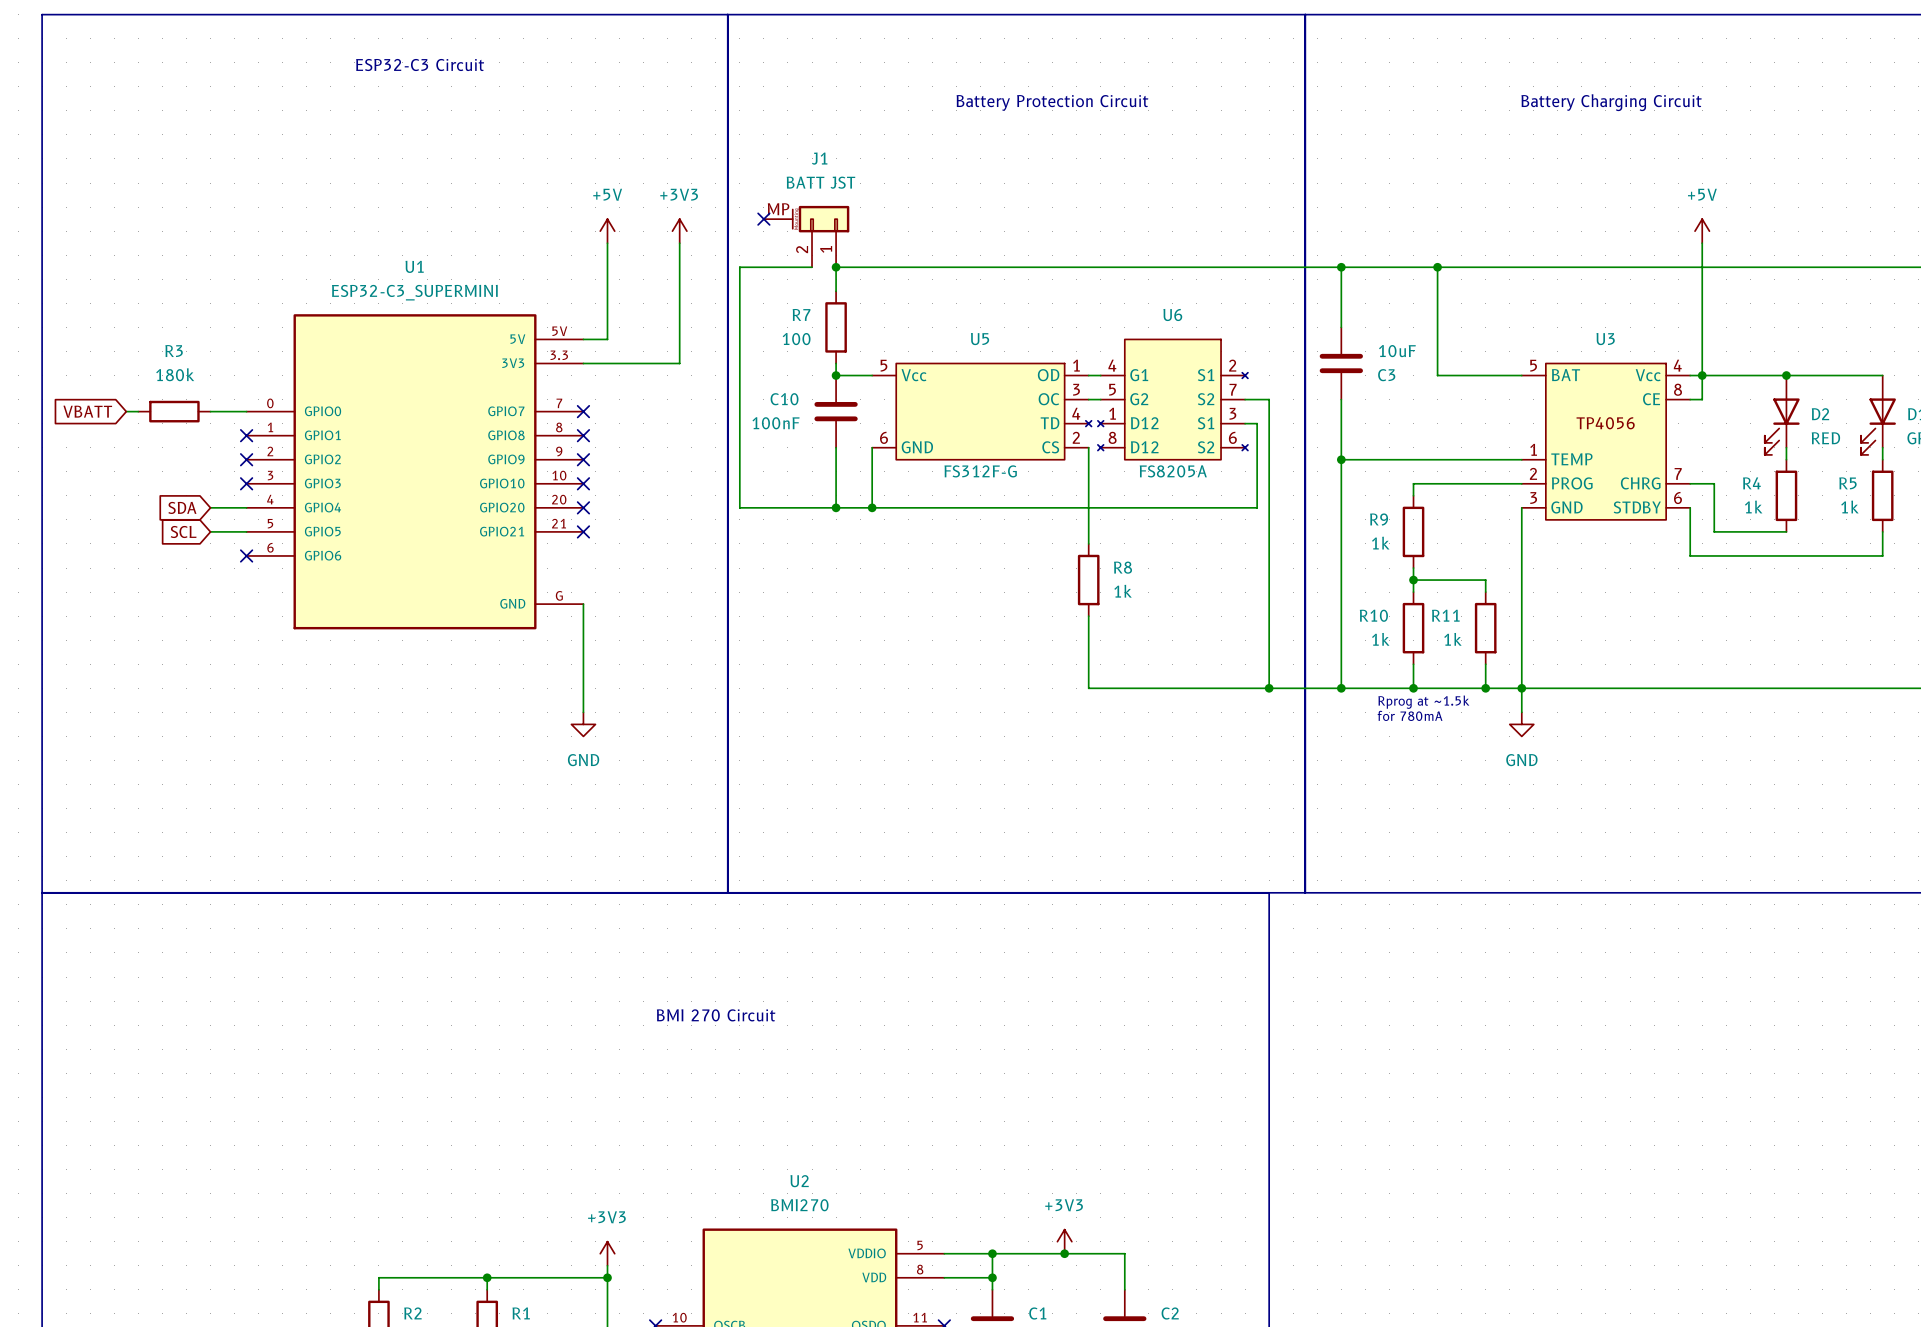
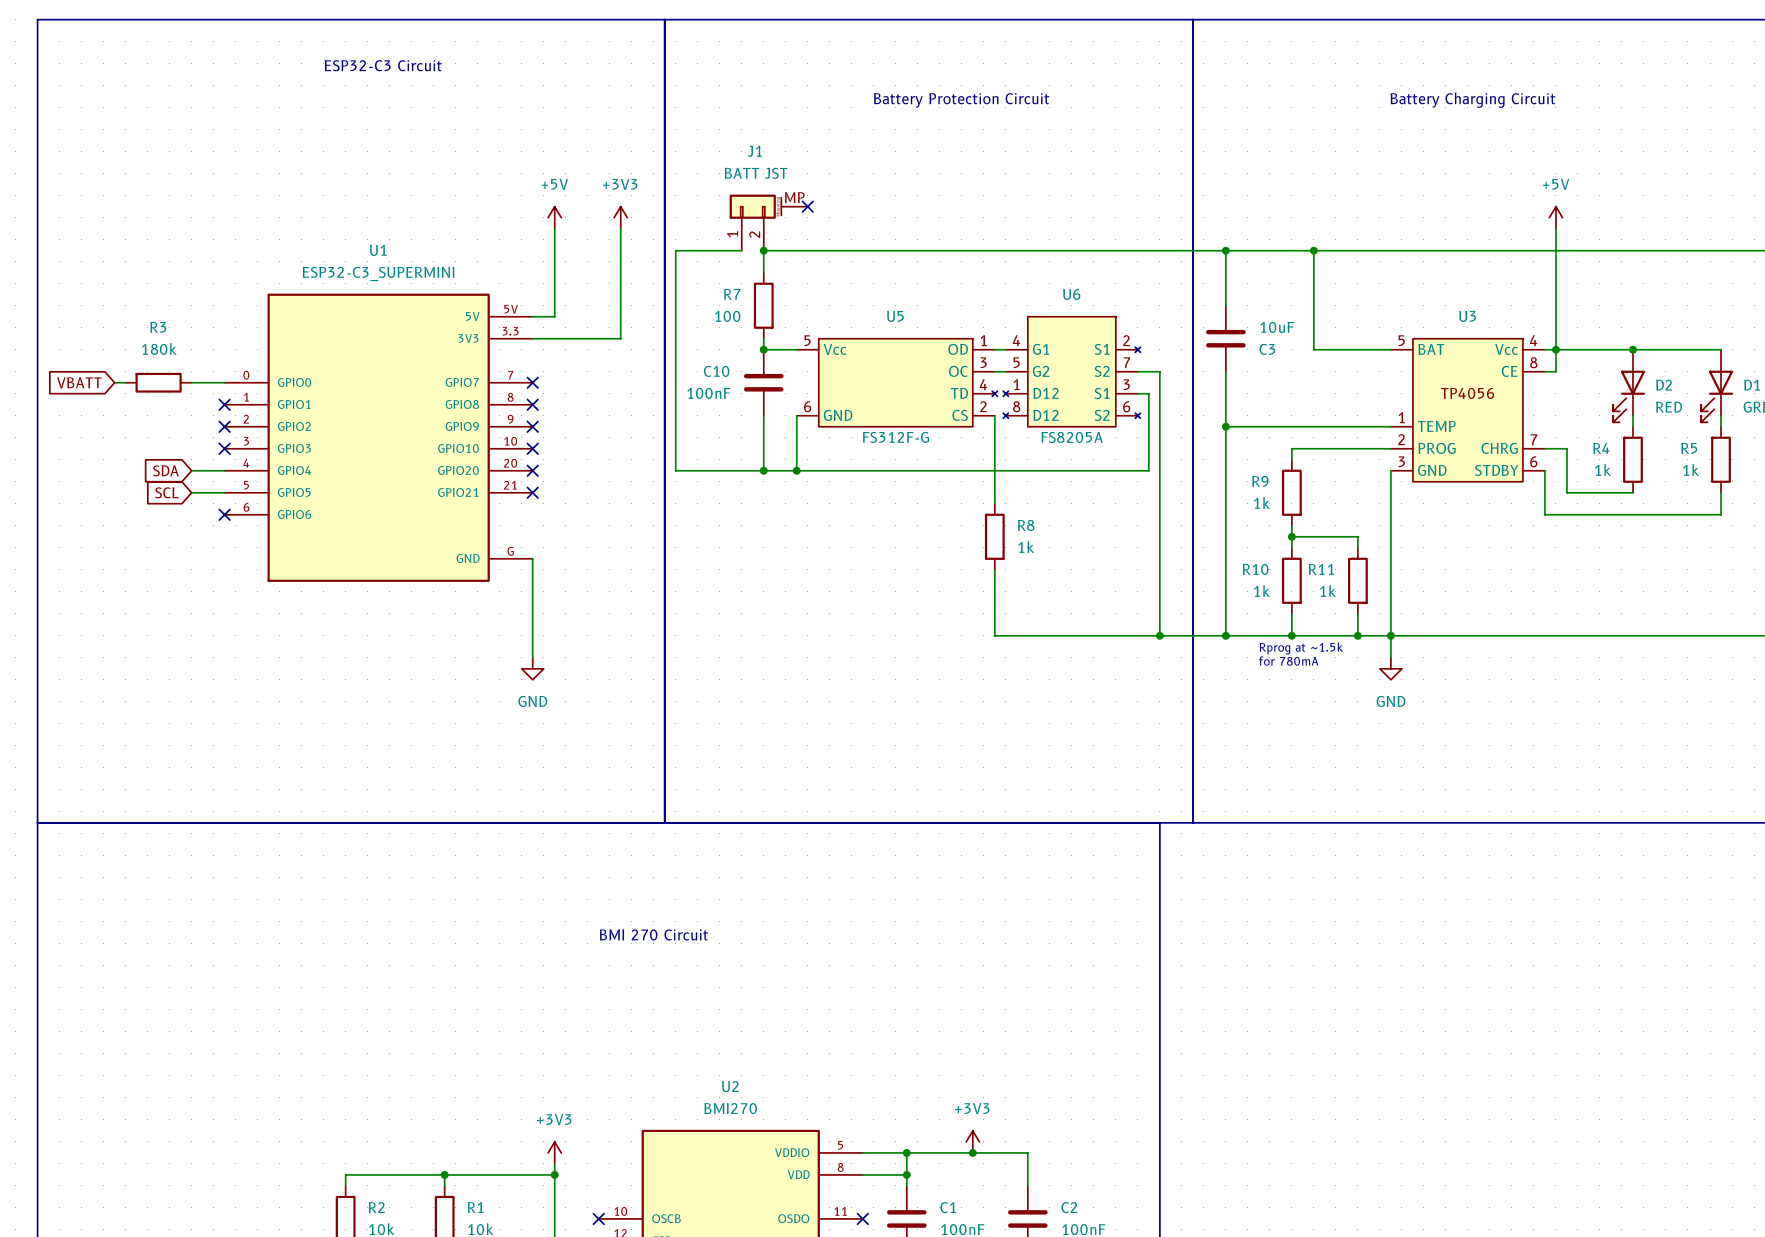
no-connect mark: (763, 219) -> none
J1 flip: as is (820, 219) -> left-right (755, 206)
no-connect mark: none -> (807, 206)

